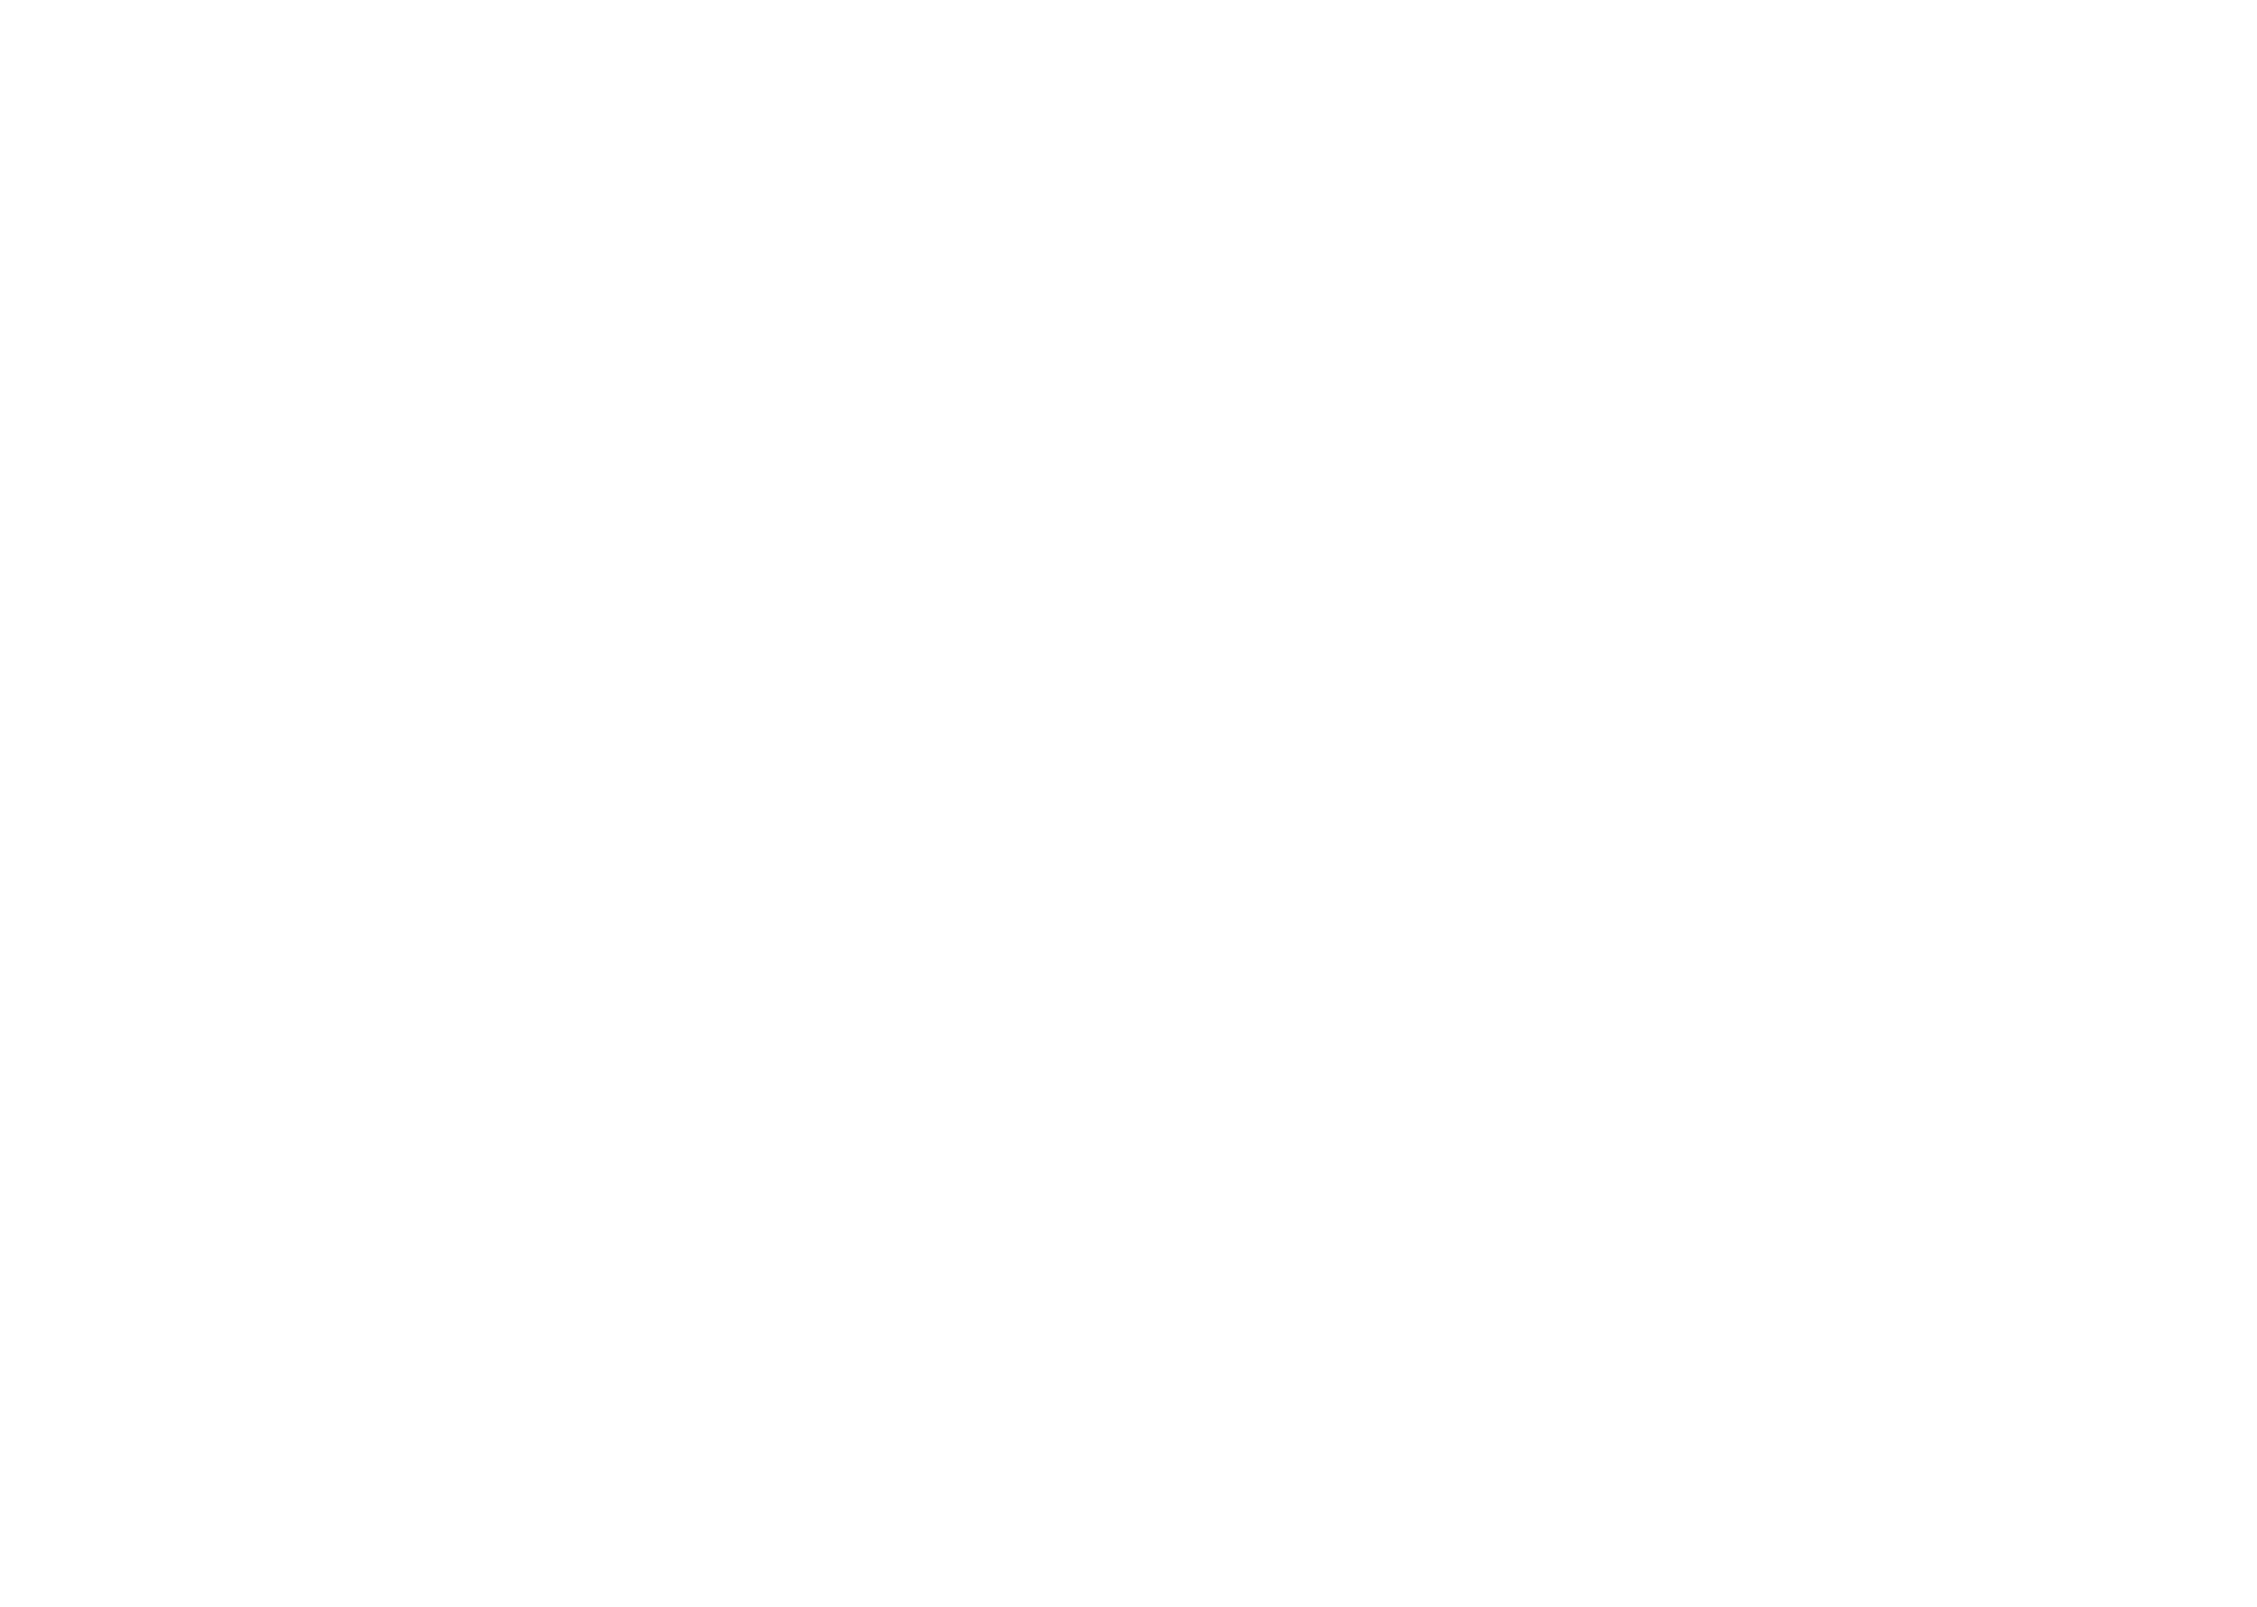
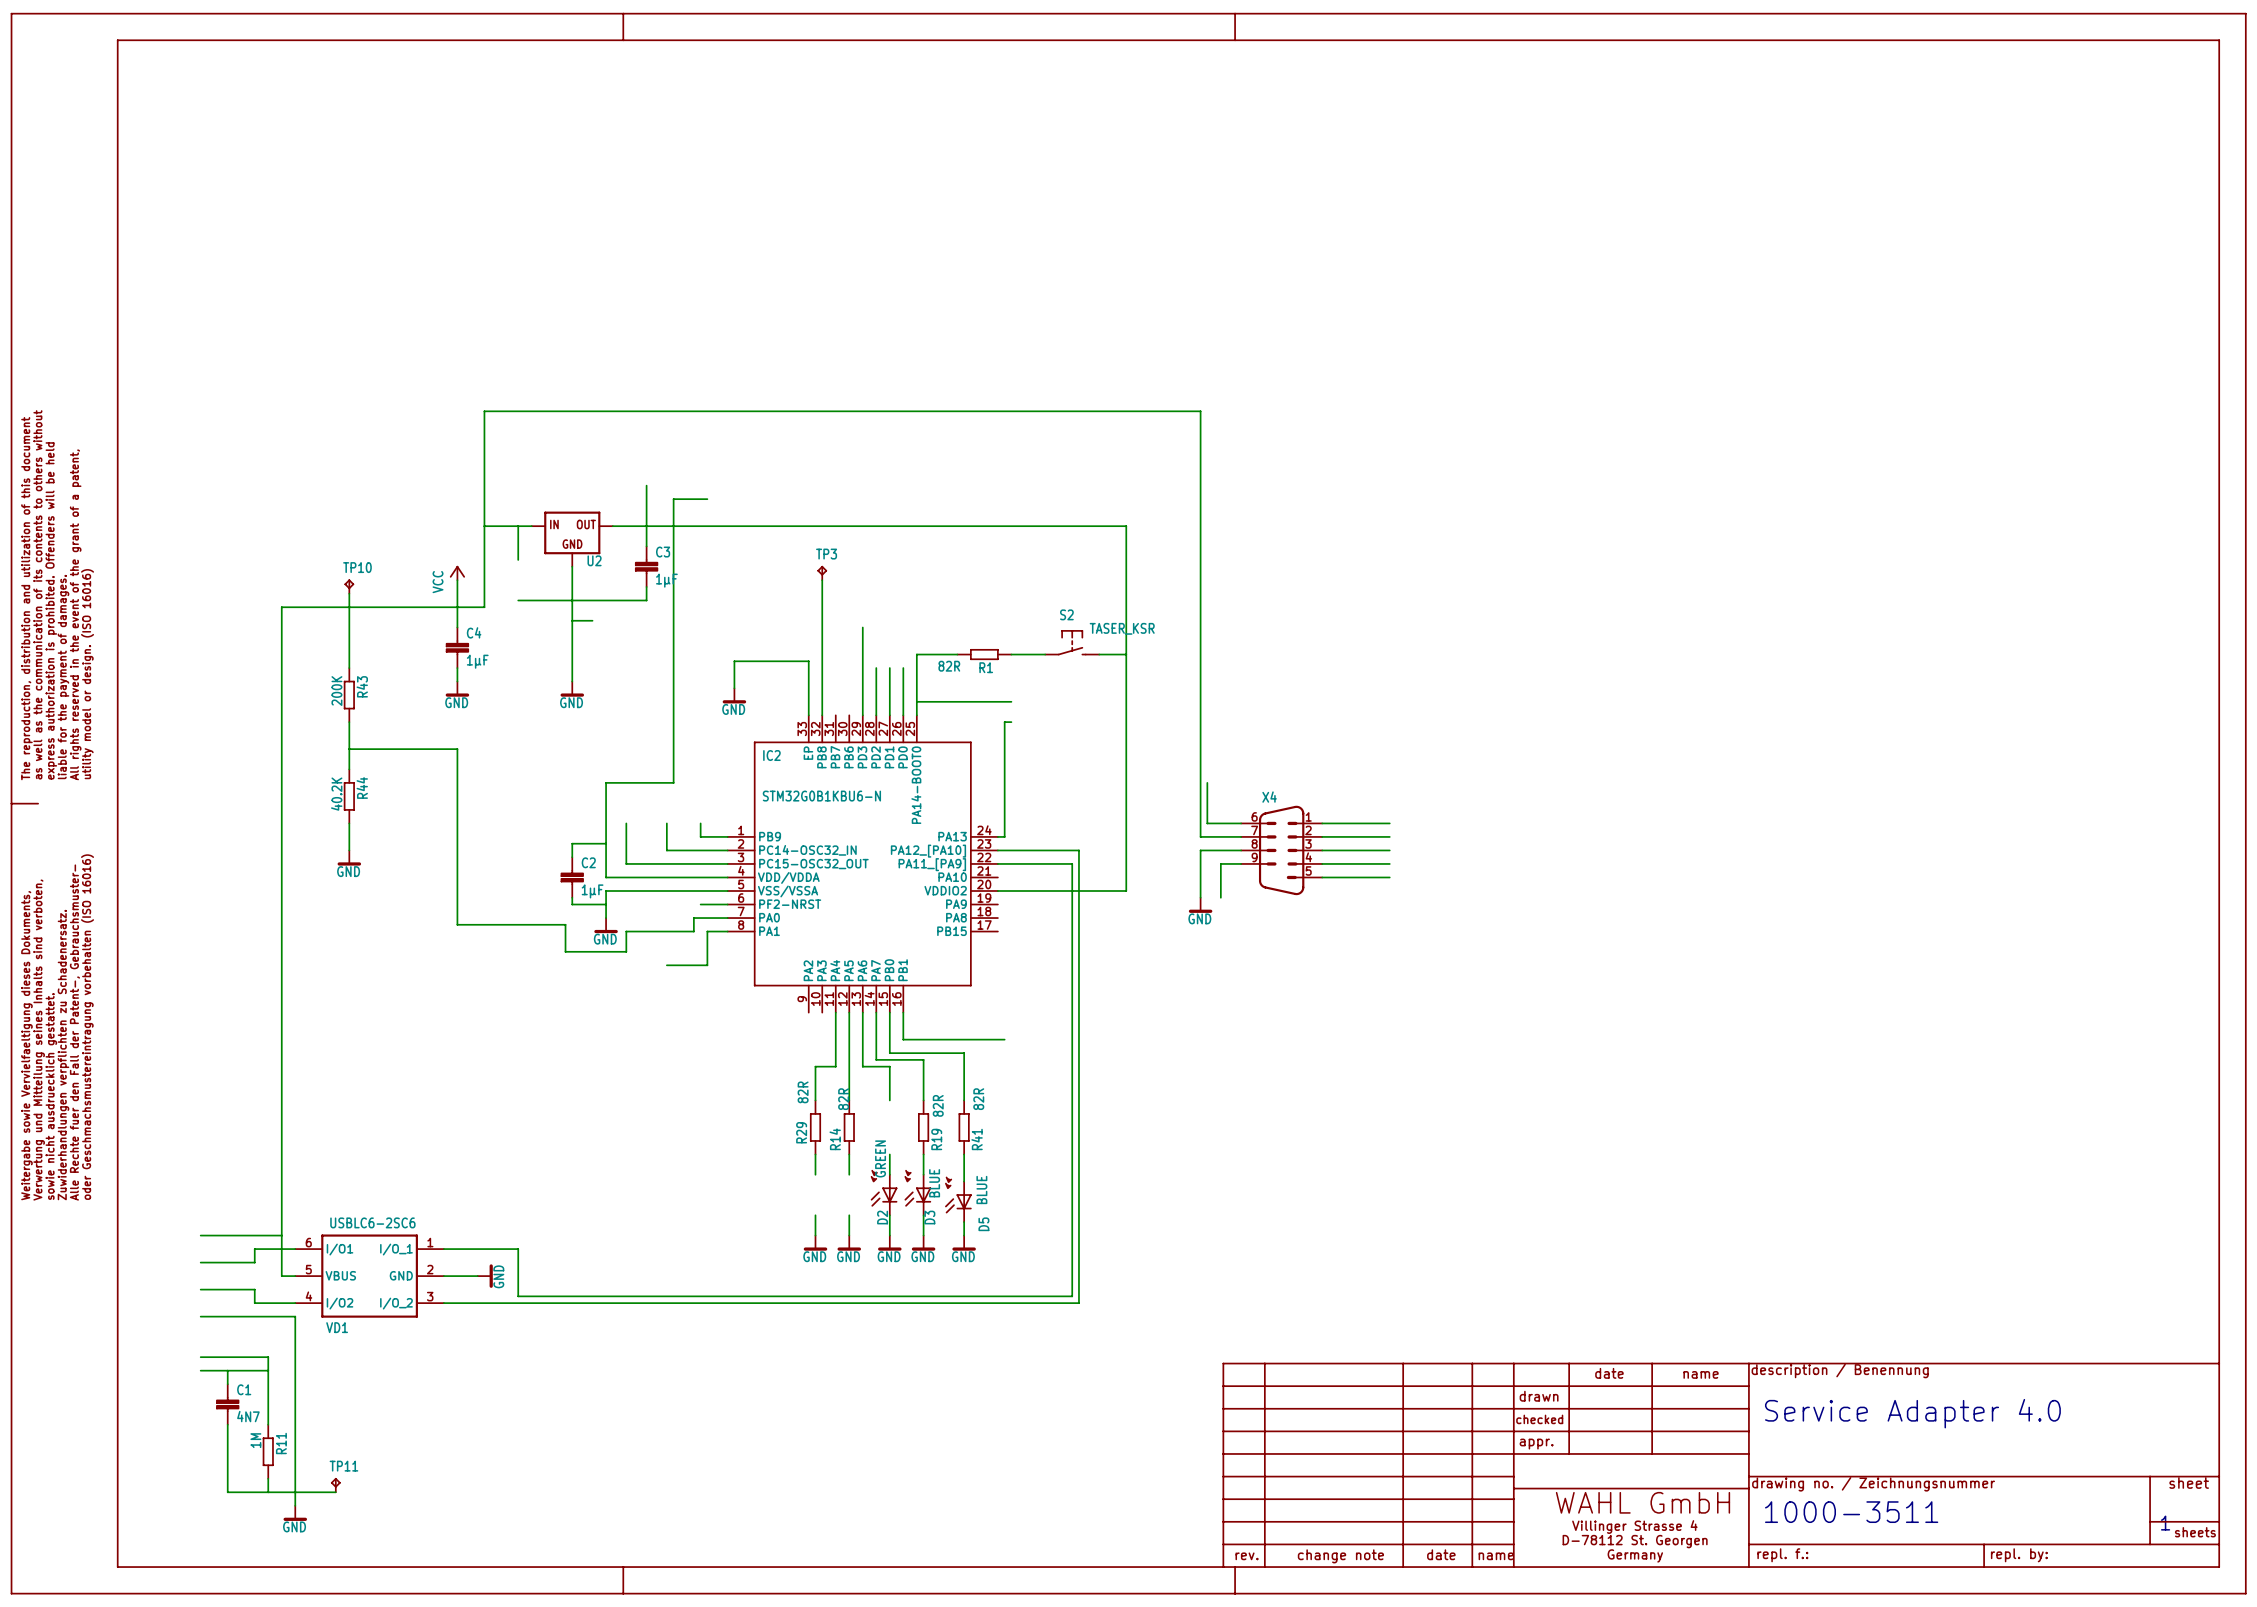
drawing: none -> [11, 13, 2246, 1594]
wire: none -> (646, 485) (646, 546)
wire: none -> (707, 499) (673, 499) (673, 782) (606, 782) (606, 877) (727, 877)
wire: none -> (484, 526) (531, 526)
wire: none -> (518, 526) (518, 559)
wire: none -> (612, 526) (1126, 526) (1126, 891) (997, 891)
U2: none -> (572, 539)
wire: none -> (572, 566) (572, 681)
C3: none -> 1µF (646, 566)
power symbol: none -> VCC (457, 573)
TP3: none -> (822, 573)
wire: none -> (457, 580) (457, 627)
wire: none -> (822, 580) (822, 715)
TP10: none -> (349, 586)
wire: none -> (646, 586) (646, 600) (518, 600)
wire: none -> (349, 593) (349, 668)
wire: none -> (572, 620) (592, 620)
wire: none -> (862, 627) (862, 715)
S2: none -> TASER_KSR (1072, 642)
C4: none -> 1µF (457, 647)
wire: none -> (957, 654) (916, 654) (916, 715)
R1: none -> 82R (984, 654)
wire: none -> (1011, 654) (1045, 654)
wire: none -> (1099, 654) (1126, 654)
wire: none -> (457, 668) (457, 681)
wire: none -> (876, 668) (876, 715)
wire: none -> (889, 668) (889, 715)
wire: none -> (903, 668) (903, 715)
wire: none -> (734, 688) (734, 661) (808, 661) (808, 715)
power symbol: none -> GND (457, 689)
power symbol: none -> GND (572, 689)
R43: none -> 200K (349, 695)
power symbol: none -> GND (734, 695)
wire: none -> (916, 701) (1011, 701)
wire: none -> (349, 722) (349, 769)
wire: none -> (1011, 722) (1004, 722) (1004, 836) (997, 836)
wire: none -> (349, 749) (457, 749) (457, 924) (565, 924) (565, 951) (626, 951) (626, 931) (693, 931) (693, 918) (727, 918)
wire: none -> (1207, 782) (1207, 823) (1241, 823)
R44: none -> 40.2K (349, 796)
wire: none -> (349, 823) (349, 850)
wire: none -> (626, 823) (626, 863) (727, 863)
wire: none -> (666, 823) (666, 850) (727, 850)
wire: none -> (700, 823) (700, 836) (727, 836)
wire: none -> (1322, 823) (1389, 823)
wire: none -> (1241, 836) (1200, 836) (1200, 411) (484, 411) (484, 607) (281, 607) (281, 1276) (295, 1276)
wire: none -> (1322, 836) (1389, 836)
wire: none -> (606, 843) (572, 843) (572, 857)
wire: none -> (997, 850) (1078, 850) (1078, 1303) (443, 1303)
wire: none -> (1241, 850) (1200, 850) (1200, 897)
X4: none -> (1281, 850)
wire: none -> (1322, 850) (1389, 850)
power symbol: none -> GND (349, 858)
IC2: none -> STM32G0B1KBU6-N (862, 863)
wire: none -> (997, 863) (1072, 863) (1072, 1296) (518, 1296) (518, 1249) (443, 1249)
wire: none -> (1241, 863) (1220, 863) (1220, 897)
wire: none -> (1322, 863) (1389, 863)
C2: none -> 1µF (572, 877)
wire: none -> (1322, 877) (1389, 877)
wire: none -> (727, 891) (606, 891) (606, 918)
wire: none -> (572, 897) (572, 904) (606, 904)
wire: none -> (700, 904) (727, 904)
power symbol: none -> GND (1200, 905)
power symbol: none -> GND (606, 925)
wire: none -> (727, 931) (707, 931) (707, 965) (666, 965)
wire: none -> (835, 1012) (835, 1066) (815, 1066) (815, 1100)
wire: none -> (849, 1012) (849, 1100)
wire: none -> (862, 1012) (862, 1066) (889, 1066) (889, 1100)
wire: none -> (876, 1012) (876, 1059) (923, 1059) (923, 1100)
wire: none -> (889, 1012) (889, 1053) (964, 1053) (964, 1100)
wire: none -> (903, 1012) (903, 1039) (1004, 1039)
R29: none -> 82R (815, 1127)
R14: none -> 82R (849, 1127)
R19: none -> 82R (923, 1127)
R41: none -> 82R (964, 1127)
wire: none -> (815, 1154) (815, 1174)
wire: none -> (849, 1154) (849, 1174)
wire: none -> (889, 1154) (889, 1174)
wire: none -> (923, 1154) (923, 1174)
wire: none -> (964, 1154) (964, 1181)
D2: none -> GREEN (884, 1192)
D3: none -> BLUE (917, 1192)
D5: none -> BLUE (958, 1199)
wire: none -> (815, 1215) (815, 1235)
wire: none -> (849, 1215) (849, 1235)
wire: none -> (889, 1215) (889, 1235)
wire: none -> (923, 1215) (923, 1235)
wire: none -> (964, 1222) (964, 1235)
wire: none -> (200, 1235) (281, 1235)
power symbol: none -> GND (815, 1243)
power symbol: none -> GND (849, 1243)
power symbol: none -> GND (889, 1243)
power symbol: none -> GND (923, 1243)
power symbol: none -> GND (964, 1243)
wire: none -> (295, 1249) (254, 1249) (254, 1262) (200, 1262)
VD1: none -> USBLC6-2SC6 (369, 1276)
wire: none -> (443, 1276) (477, 1276)
power symbol: none -> GND (485, 1276)
wire: none -> (200, 1289) (254, 1289) (254, 1303) (295, 1303)
wire: none -> (200, 1316) (295, 1316) (295, 1505)
wire: none -> (200, 1357) (268, 1357) (268, 1424)
wire: none -> (200, 1370) (268, 1370)
wire: none -> (227, 1370) (227, 1384)
C1: none -> 4N7 (227, 1404)
text: none -> Service Adapter 4.0 (1912, 1413)
wire: none -> (227, 1424) (227, 1492) (335, 1492)
R11: none -> 1M (268, 1451)
wire: none -> (268, 1478) (268, 1492)
TP11: none -> (335, 1485)
text: none -> 1000-3511 (1851, 1512)
power symbol: none -> GND (295, 1513)
text: none -> 1 (2165, 1523)

